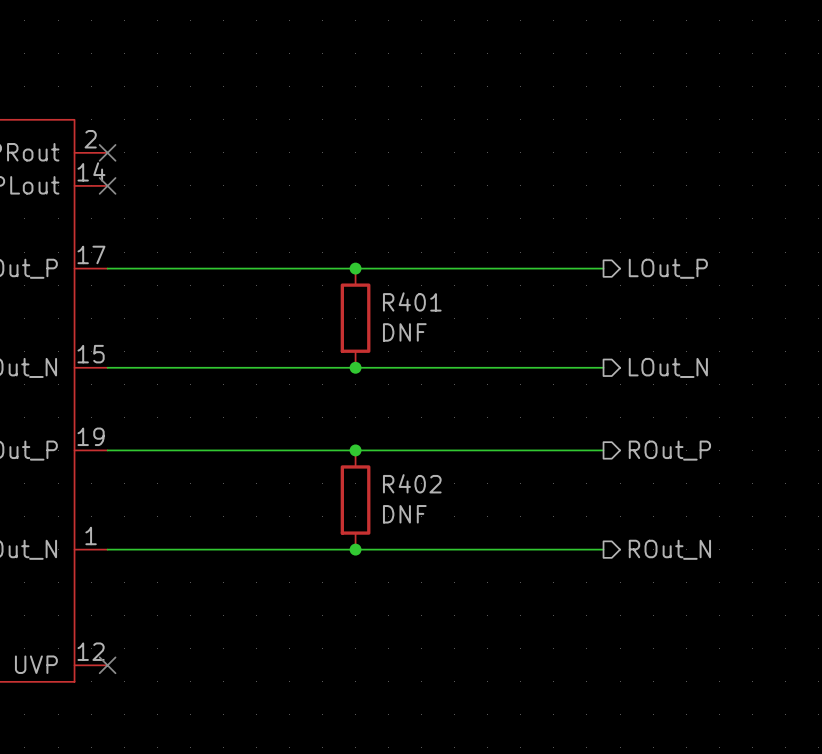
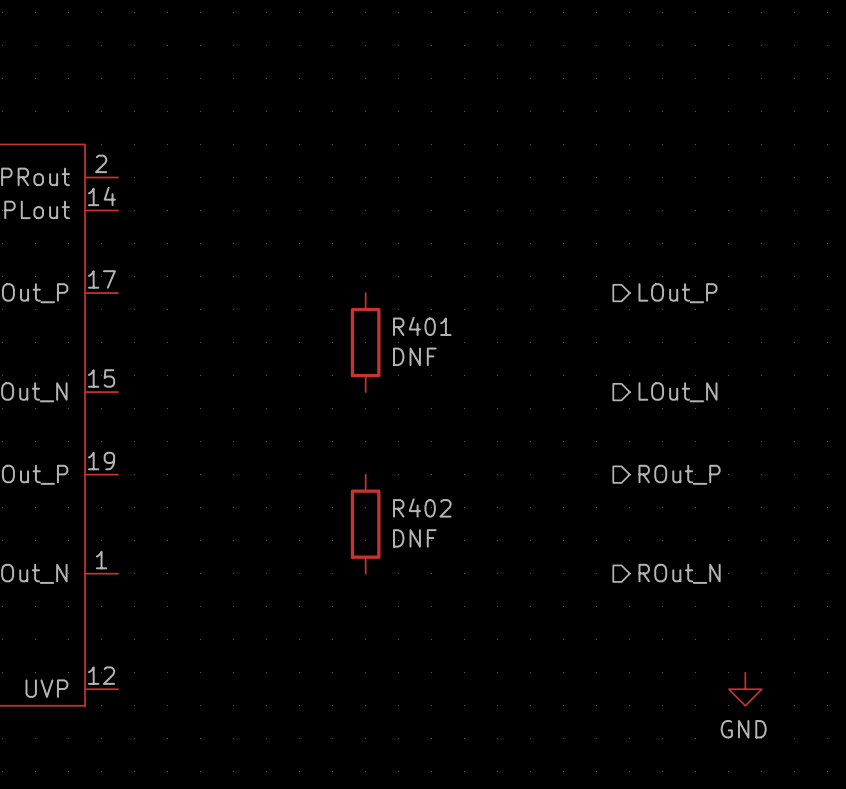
no-connect mark: (107, 152) -> none
no-connect mark: (107, 185) -> none
wire: (107, 268) (603, 268) -> none
junction: (355, 268) -> none
wire: (107, 367) (603, 367) -> none
junction: (355, 367) -> none
wire: (107, 450) (603, 450) -> none
junction: (355, 450) -> none
wire: (107, 549) (603, 549) -> none
junction: (355, 549) -> none
no-connect mark: (107, 665) -> none
power symbol: none -> GND (745, 689)

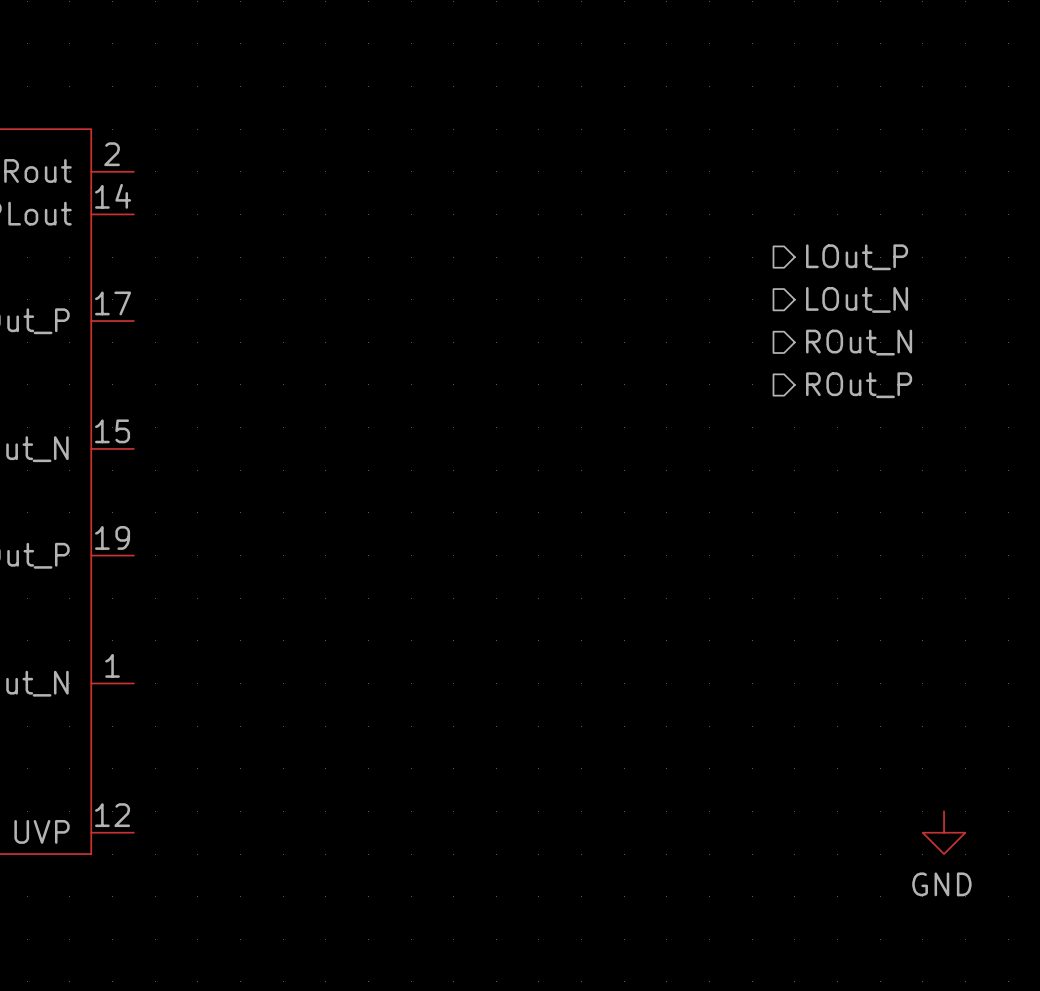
hierarchical label position: LOut_P (678, 293) -> LOut_P (857, 257)
R401: DNF (365, 342) -> none
hierarchical label position: LOut_N (678, 392) -> LOut_N (857, 299)
hierarchical label position: ROut_P (679, 474) -> ROut_P (859, 385)
R402: DNF (365, 524) -> none
hierarchical label position: ROut_N (679, 573) -> ROut_N (859, 342)

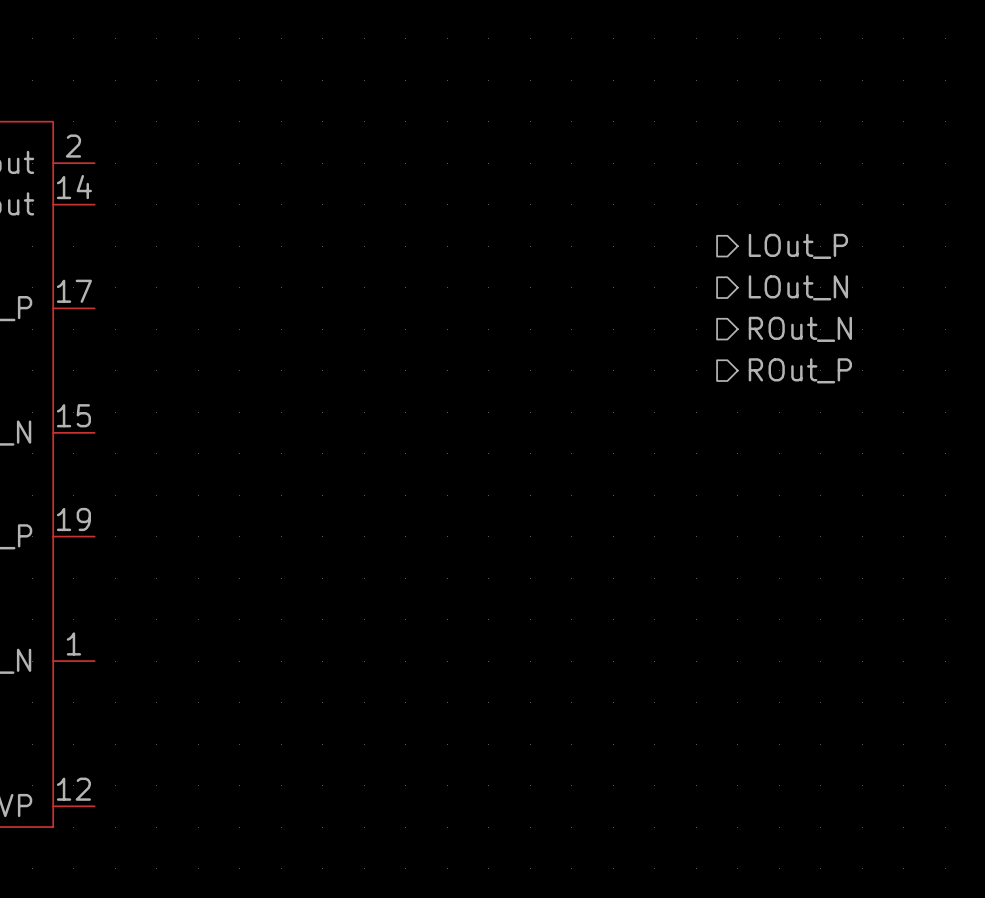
power symbol: GND (944, 832) -> none

